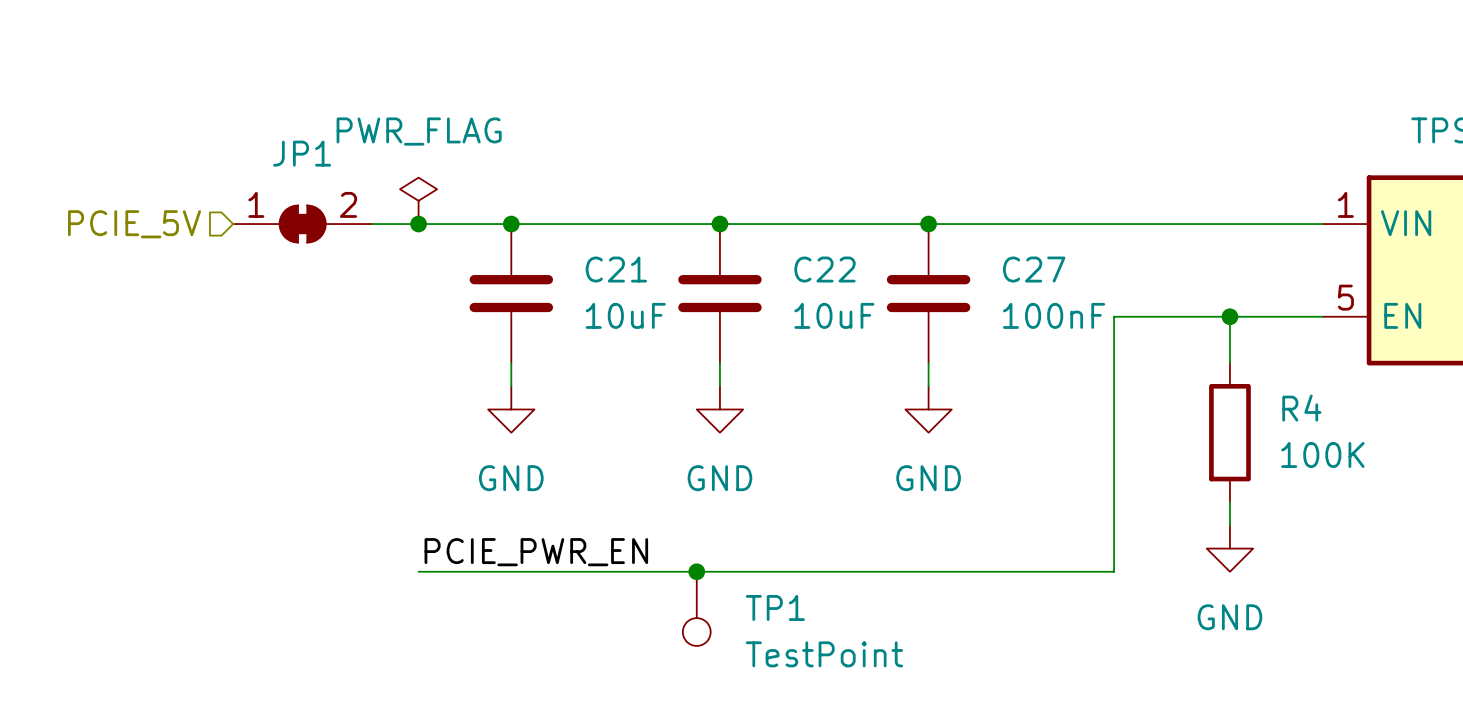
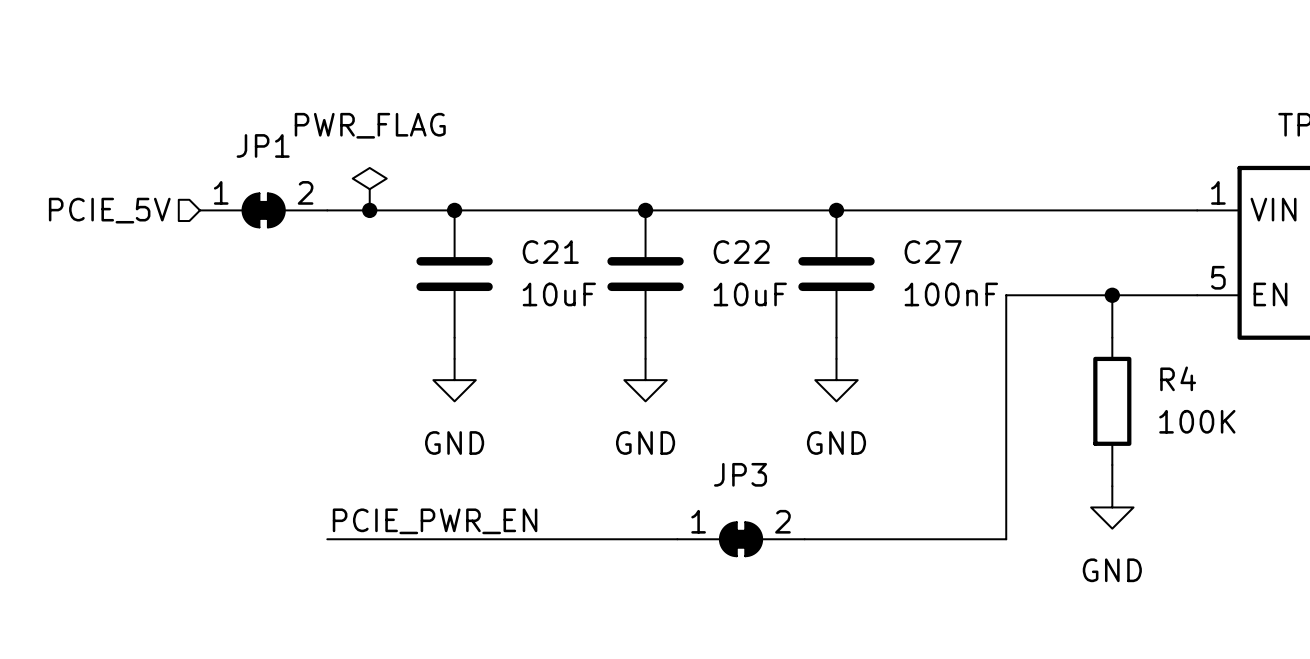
label position: PCIE_PWR_EN (536, 552) -> PCIE_PWR_EN (435, 521)
wire: (418, 571) (1114, 571) -> (804, 539) (1006, 539) (1006, 528)
junction: (696, 571) -> none
wire: none -> (327, 539) (677, 539)
JP3: none -> (741, 539)
TP1: TestPoint (696, 608) -> none

